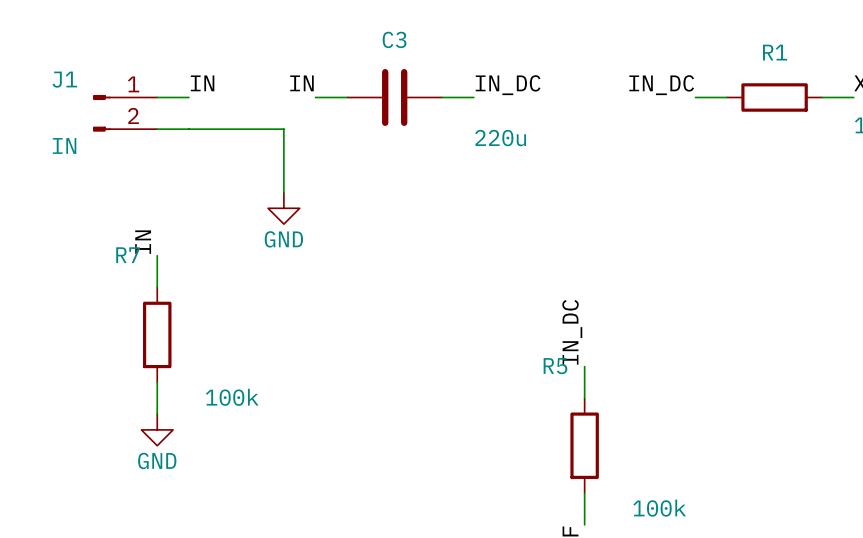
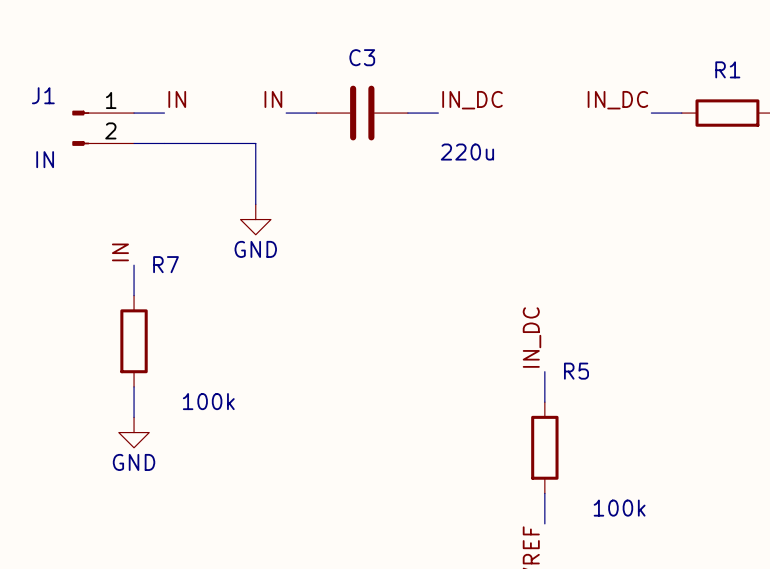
R7 name position: R7 (128, 255) -> R7 (166, 264)
R5 name position: R5 (555, 366) -> R5 (576, 371)

